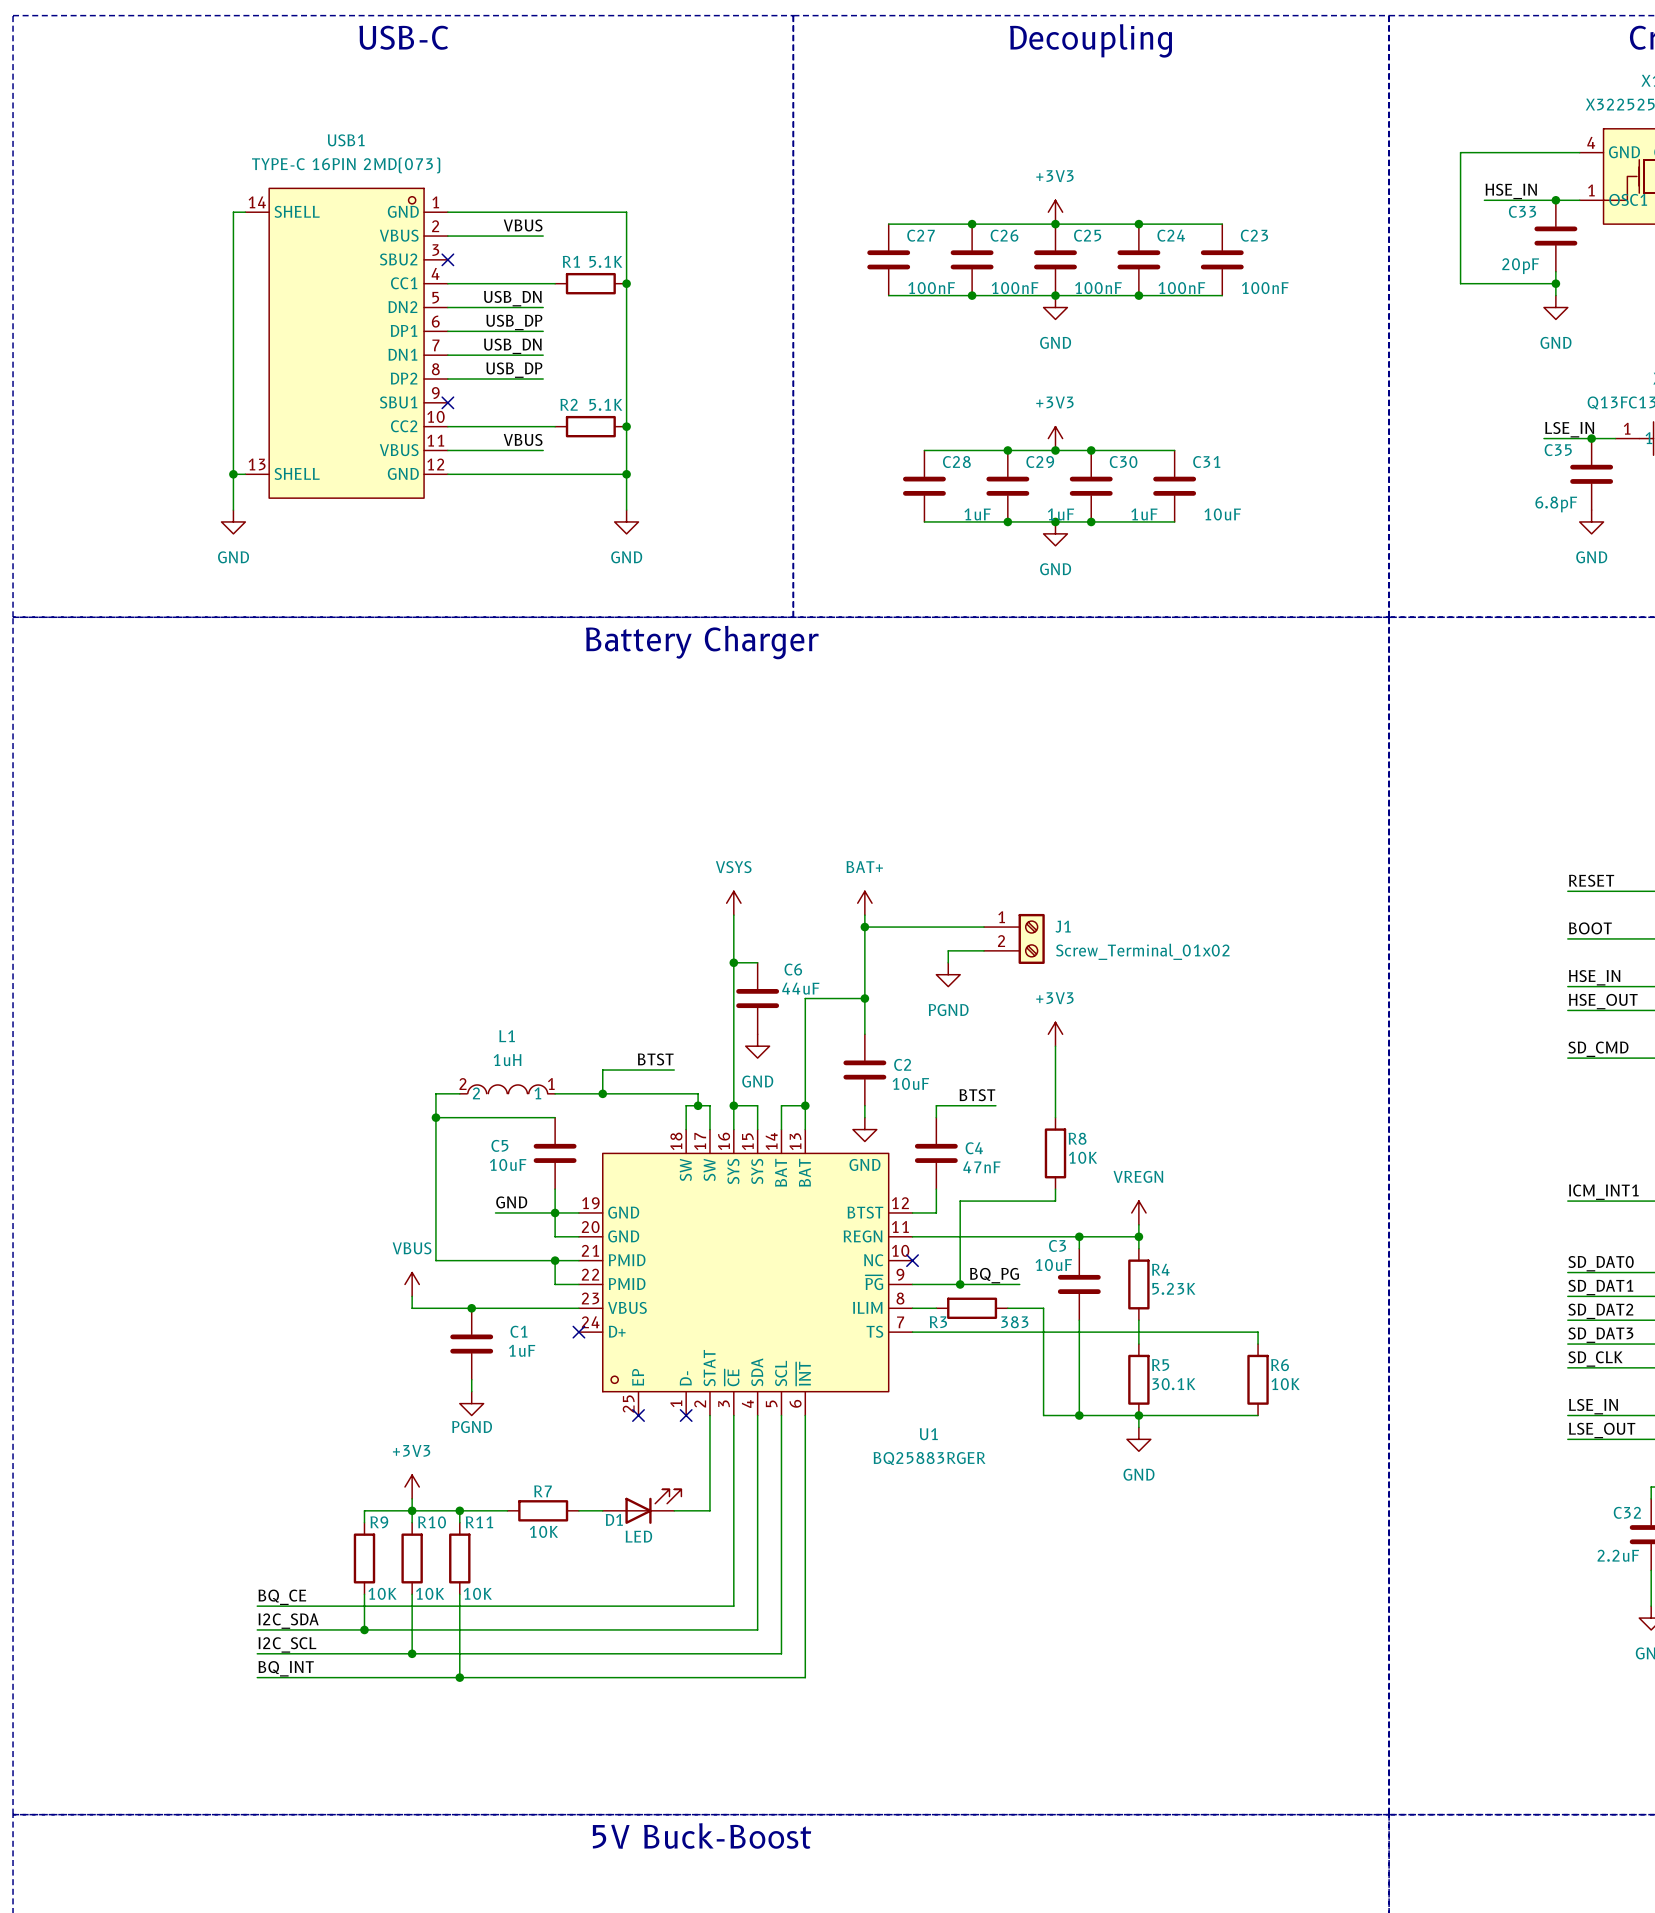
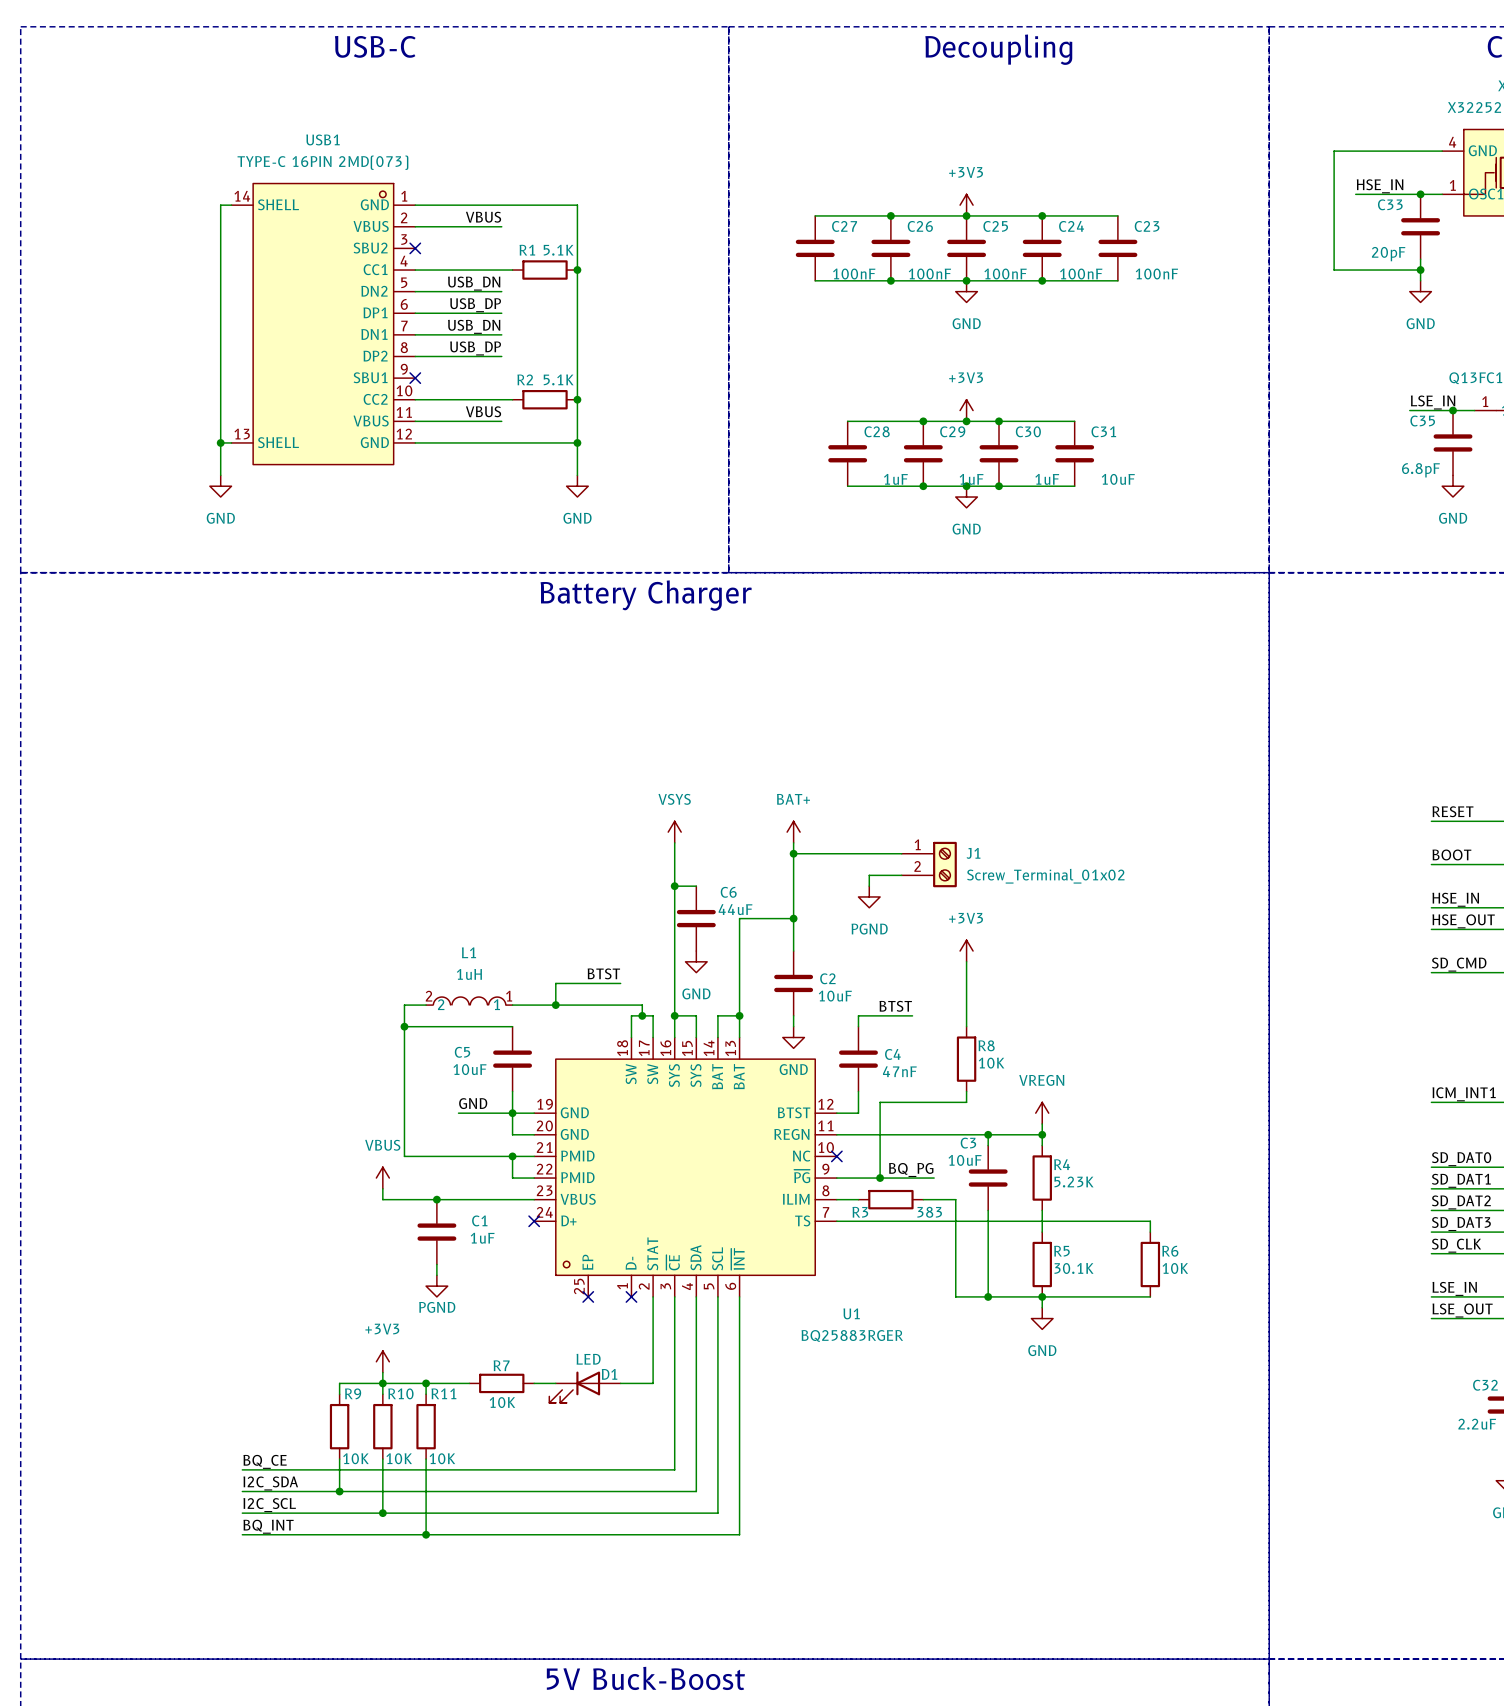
D1 rotation: 0° (653, 1506) -> 180° (574, 1387)

